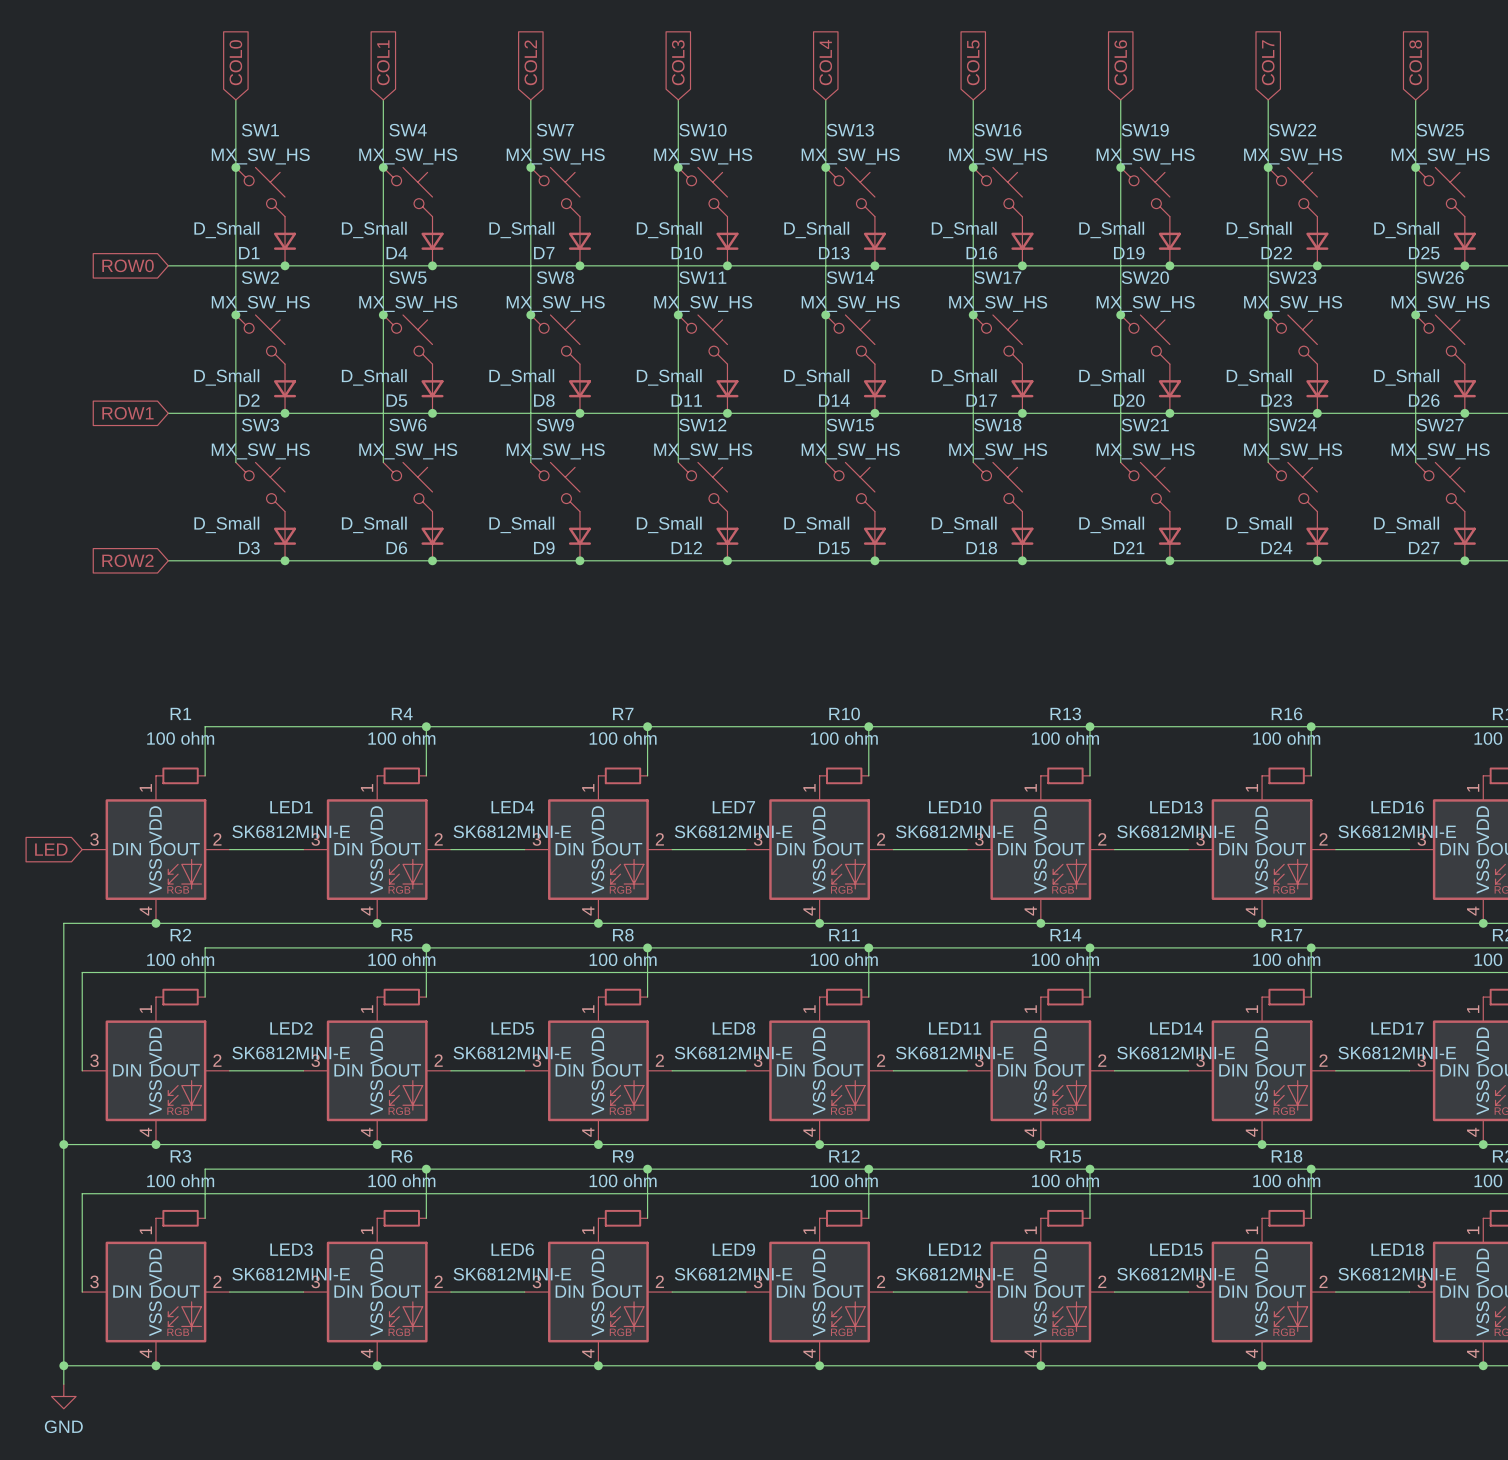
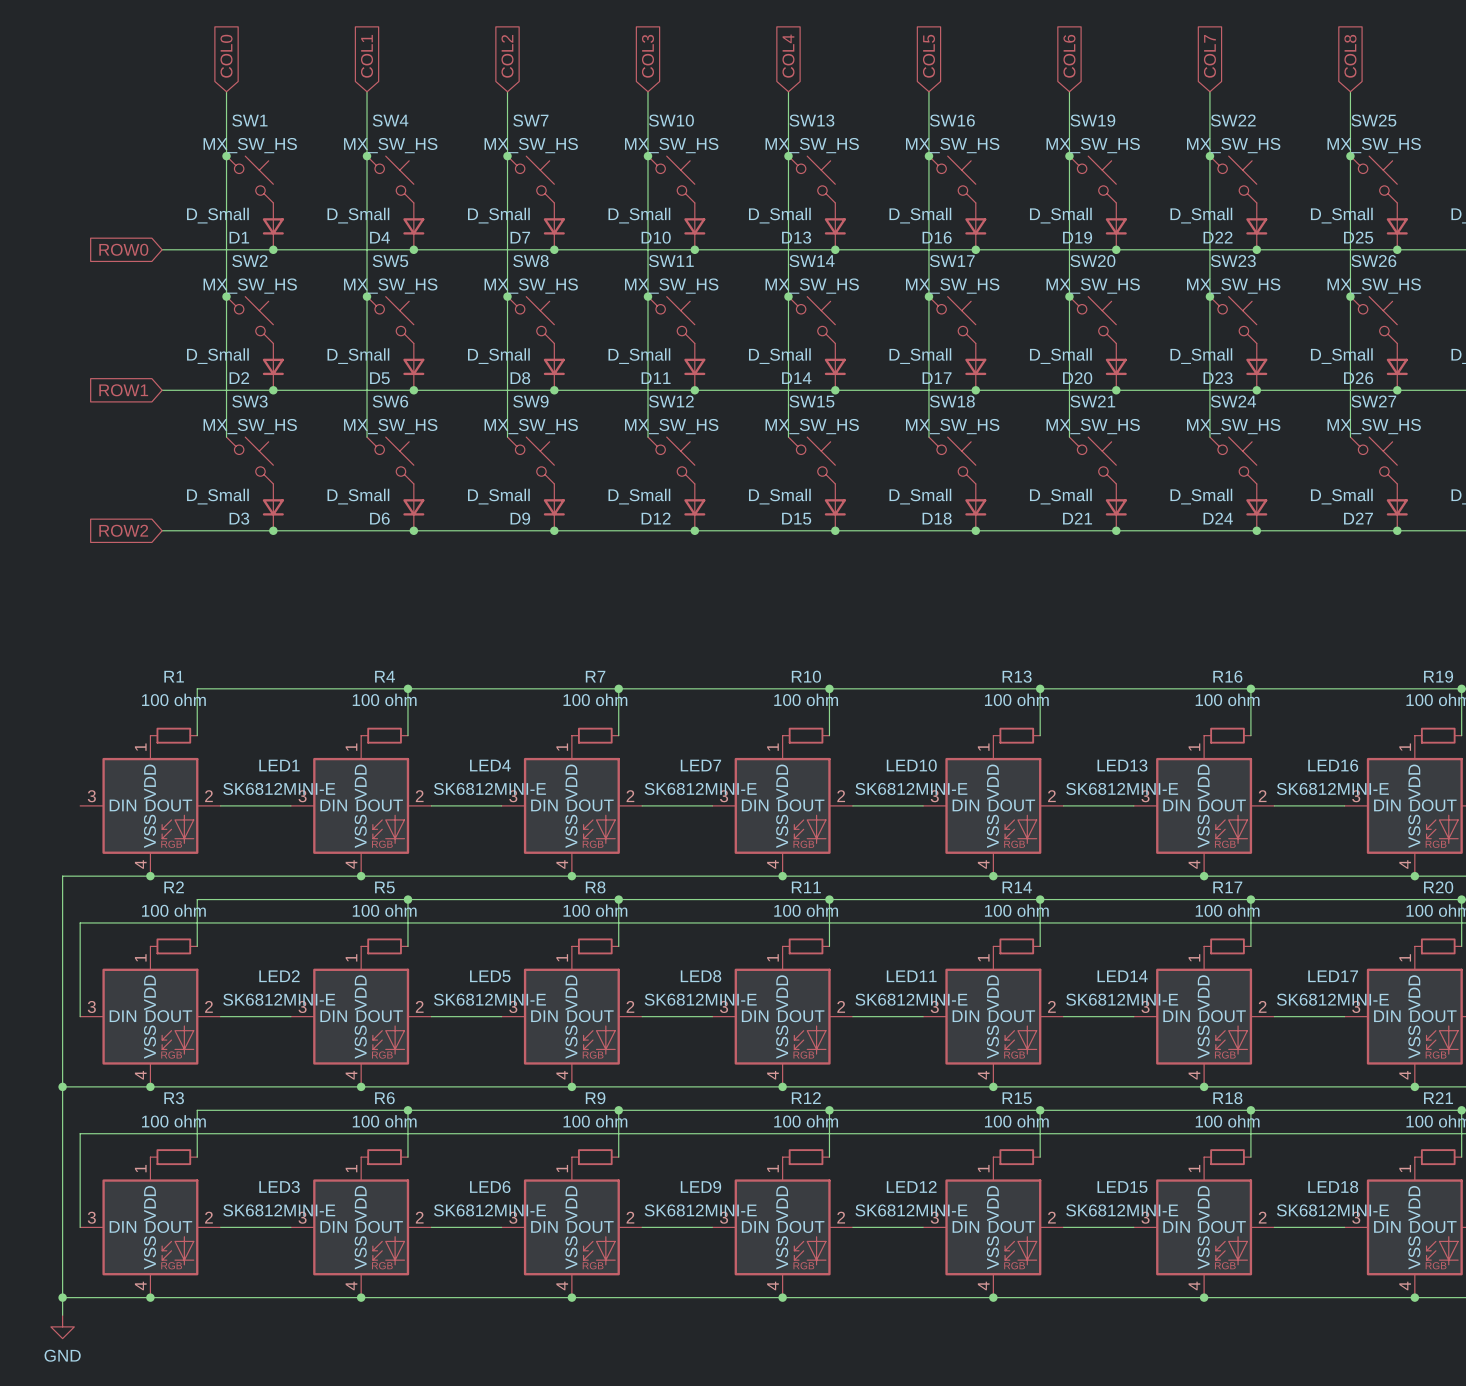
global label: LED (51, 849) -> none

